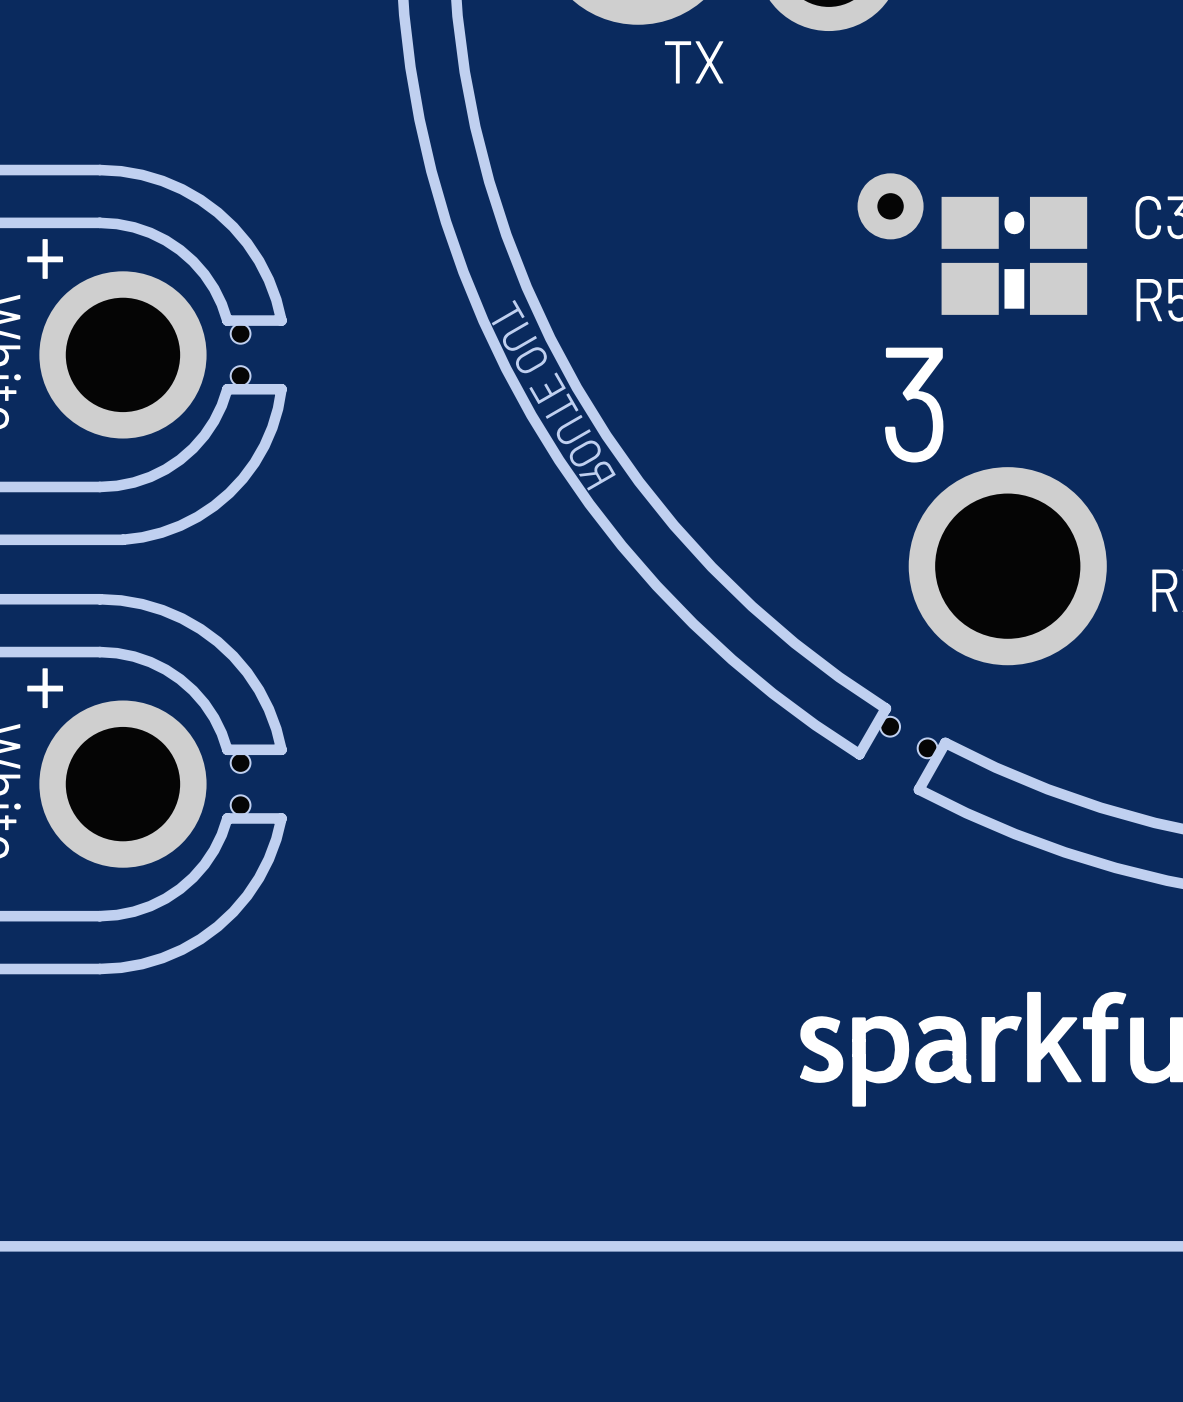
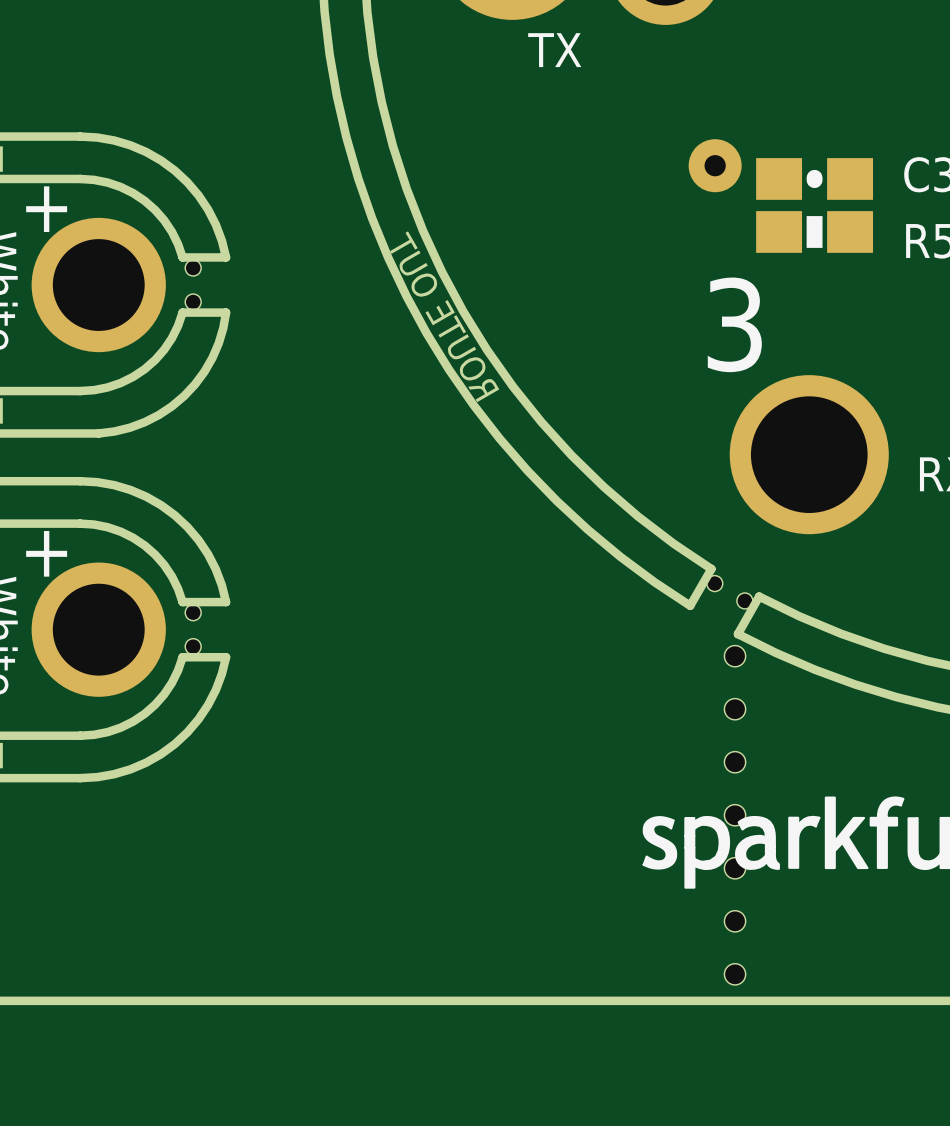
hole: none -> (735, 656)
hole: none -> (735, 709)
hole: none -> (735, 762)
hole: none -> (735, 815)
hole: none -> (735, 868)
hole: none -> (735, 921)
hole: none -> (735, 974)

